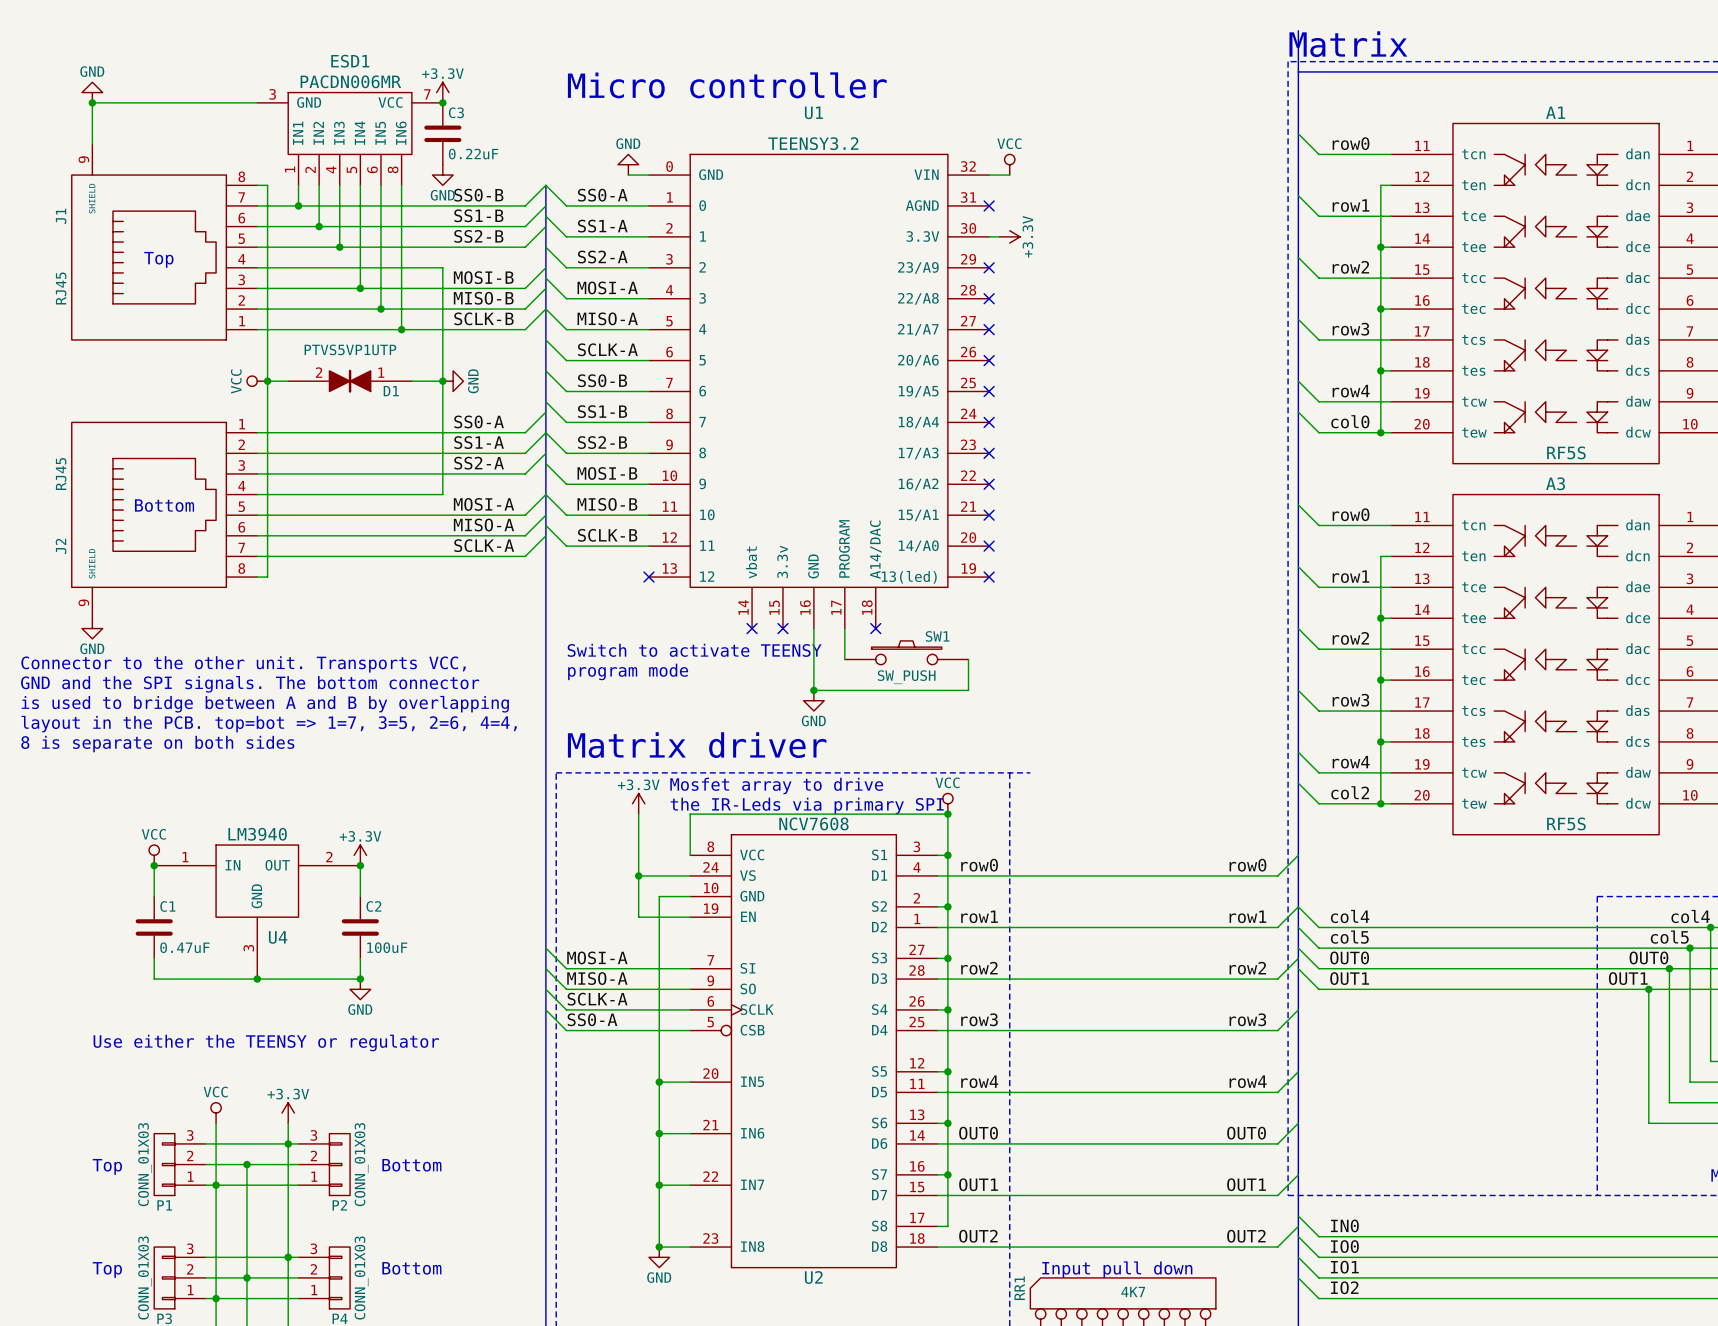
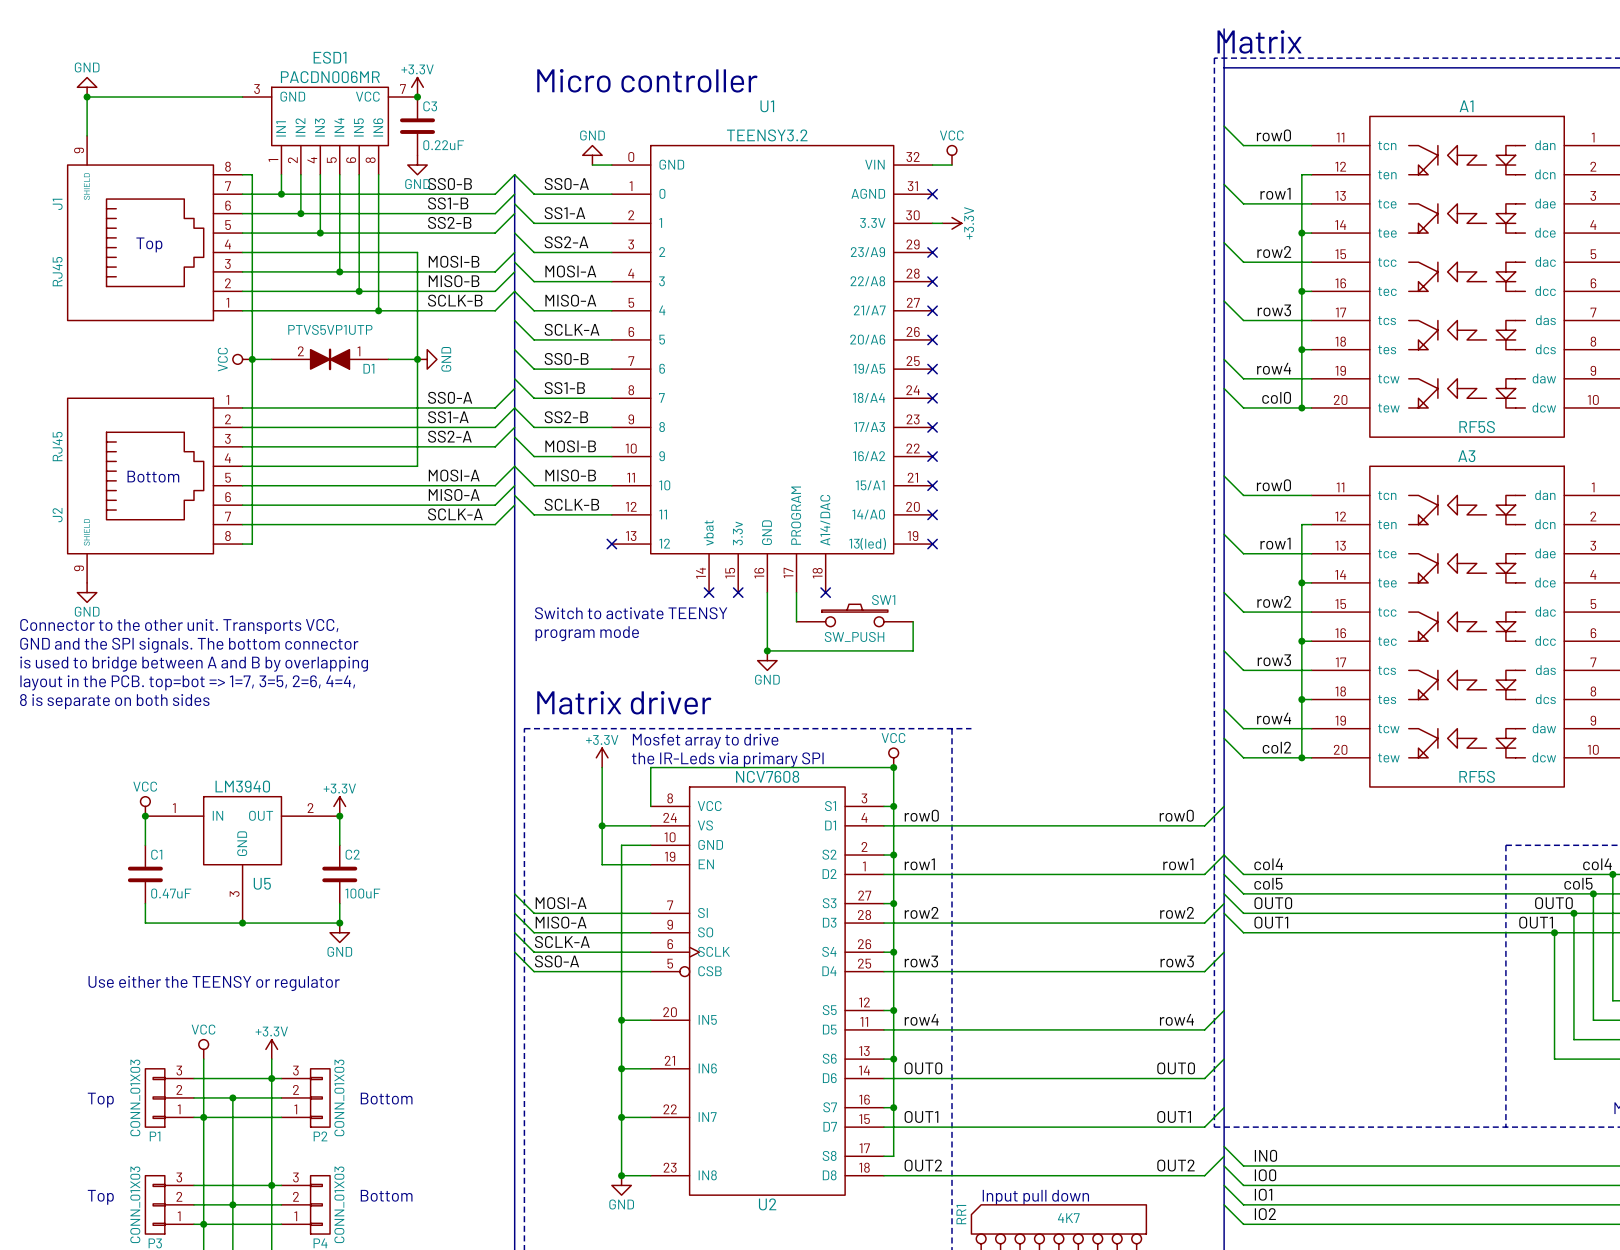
U4 name: U4 (278, 937) -> U5 (262, 883)

